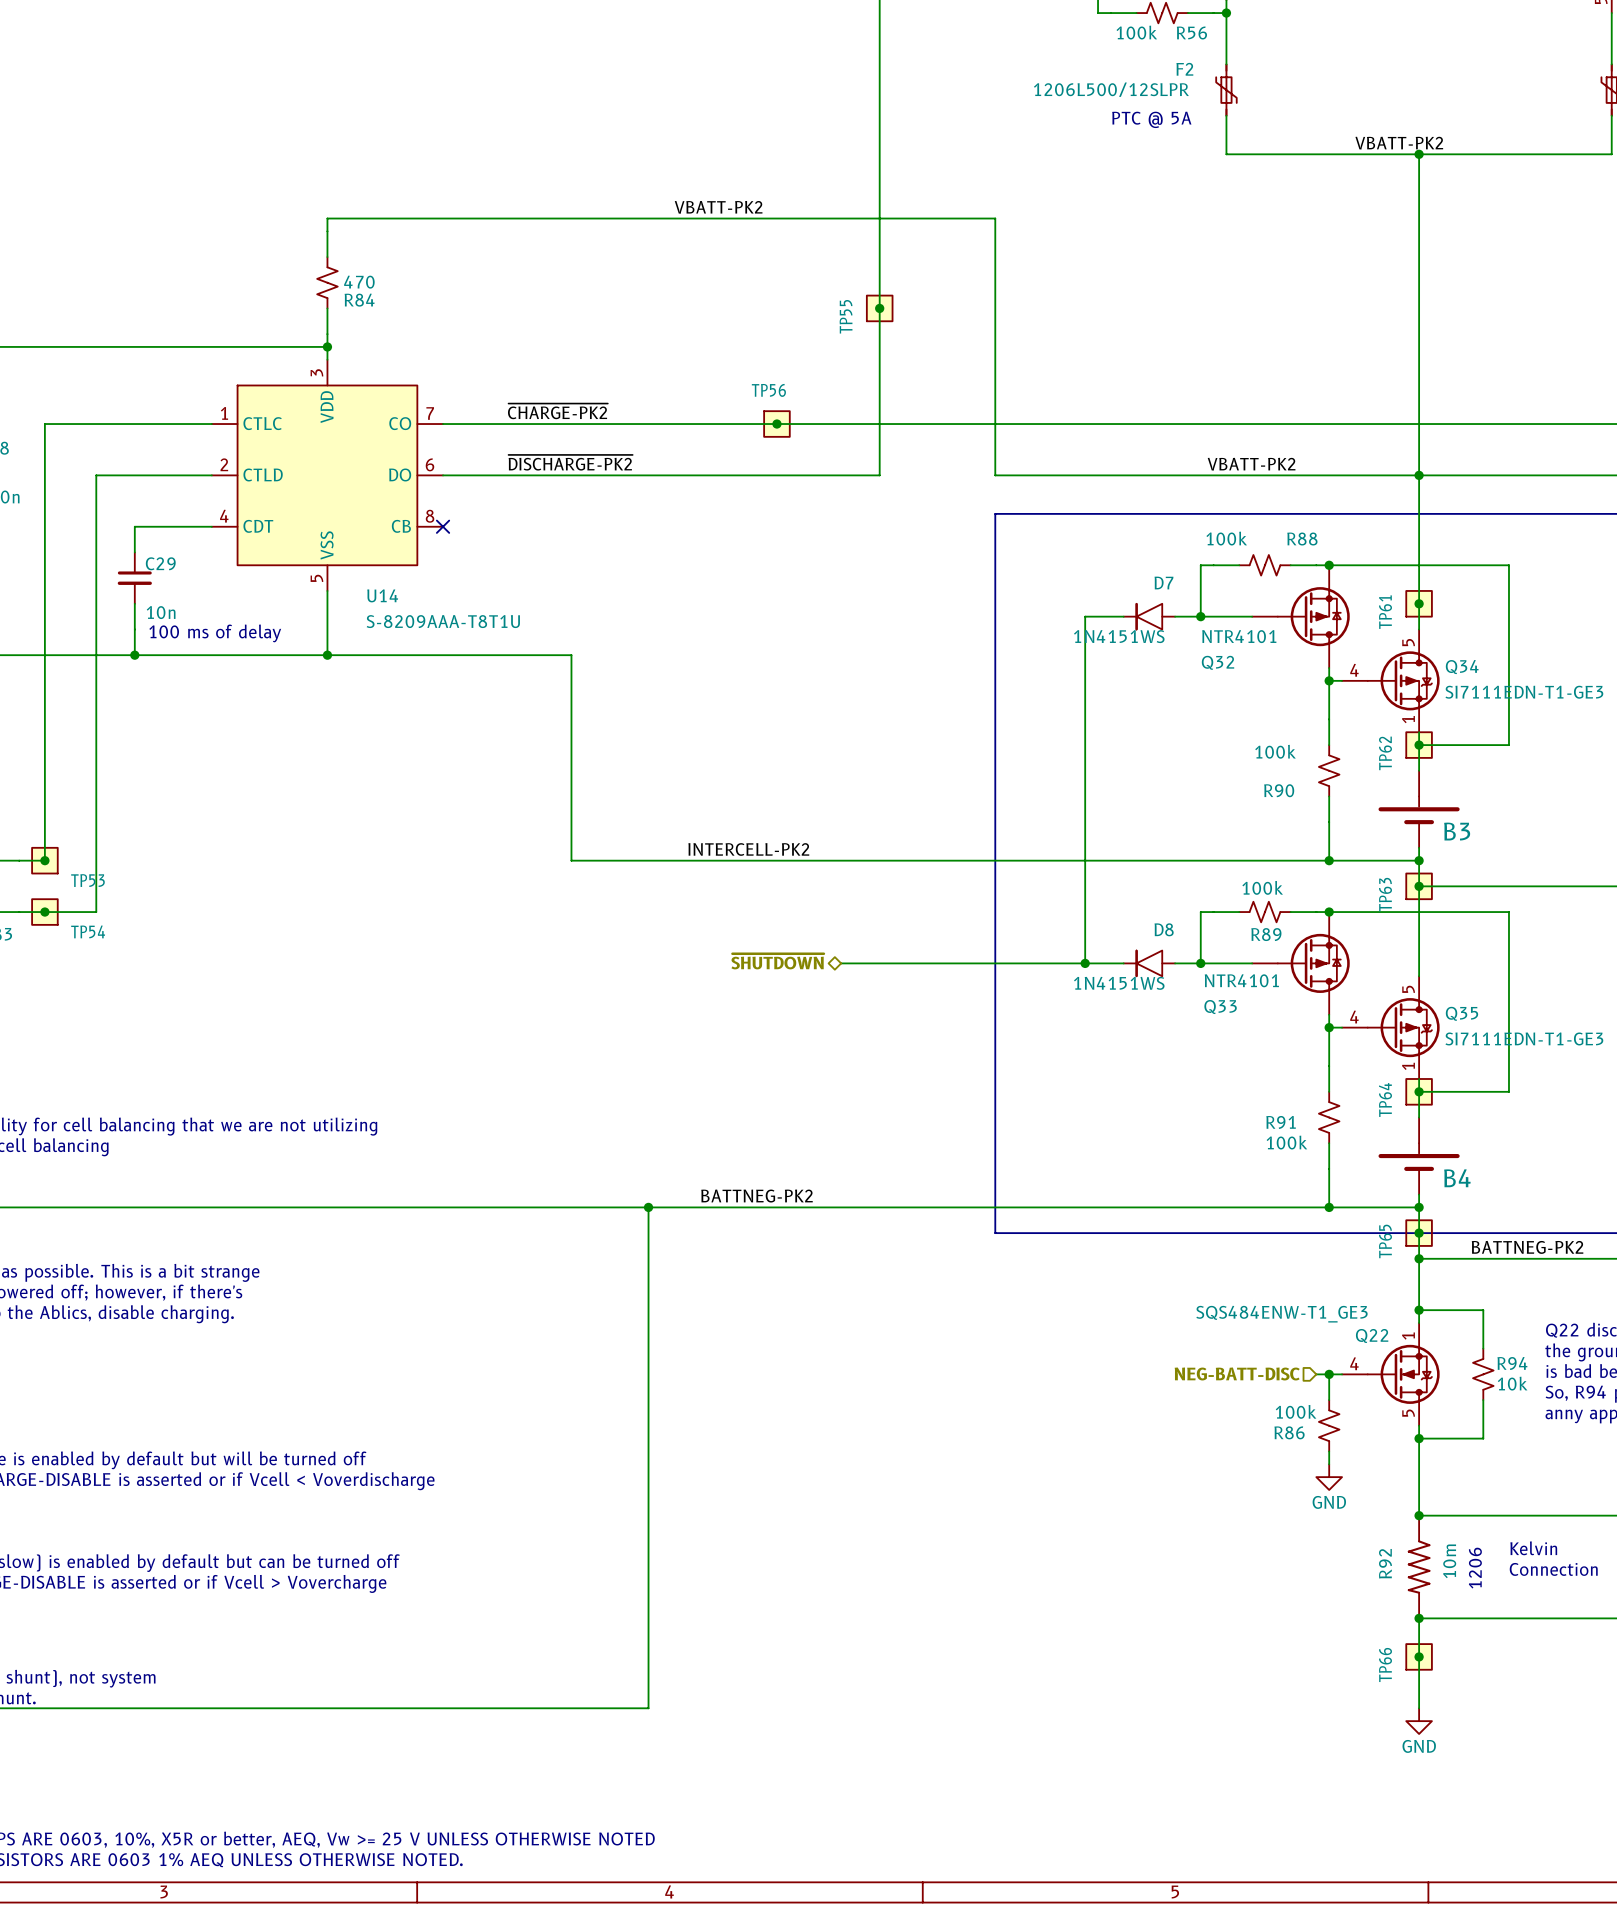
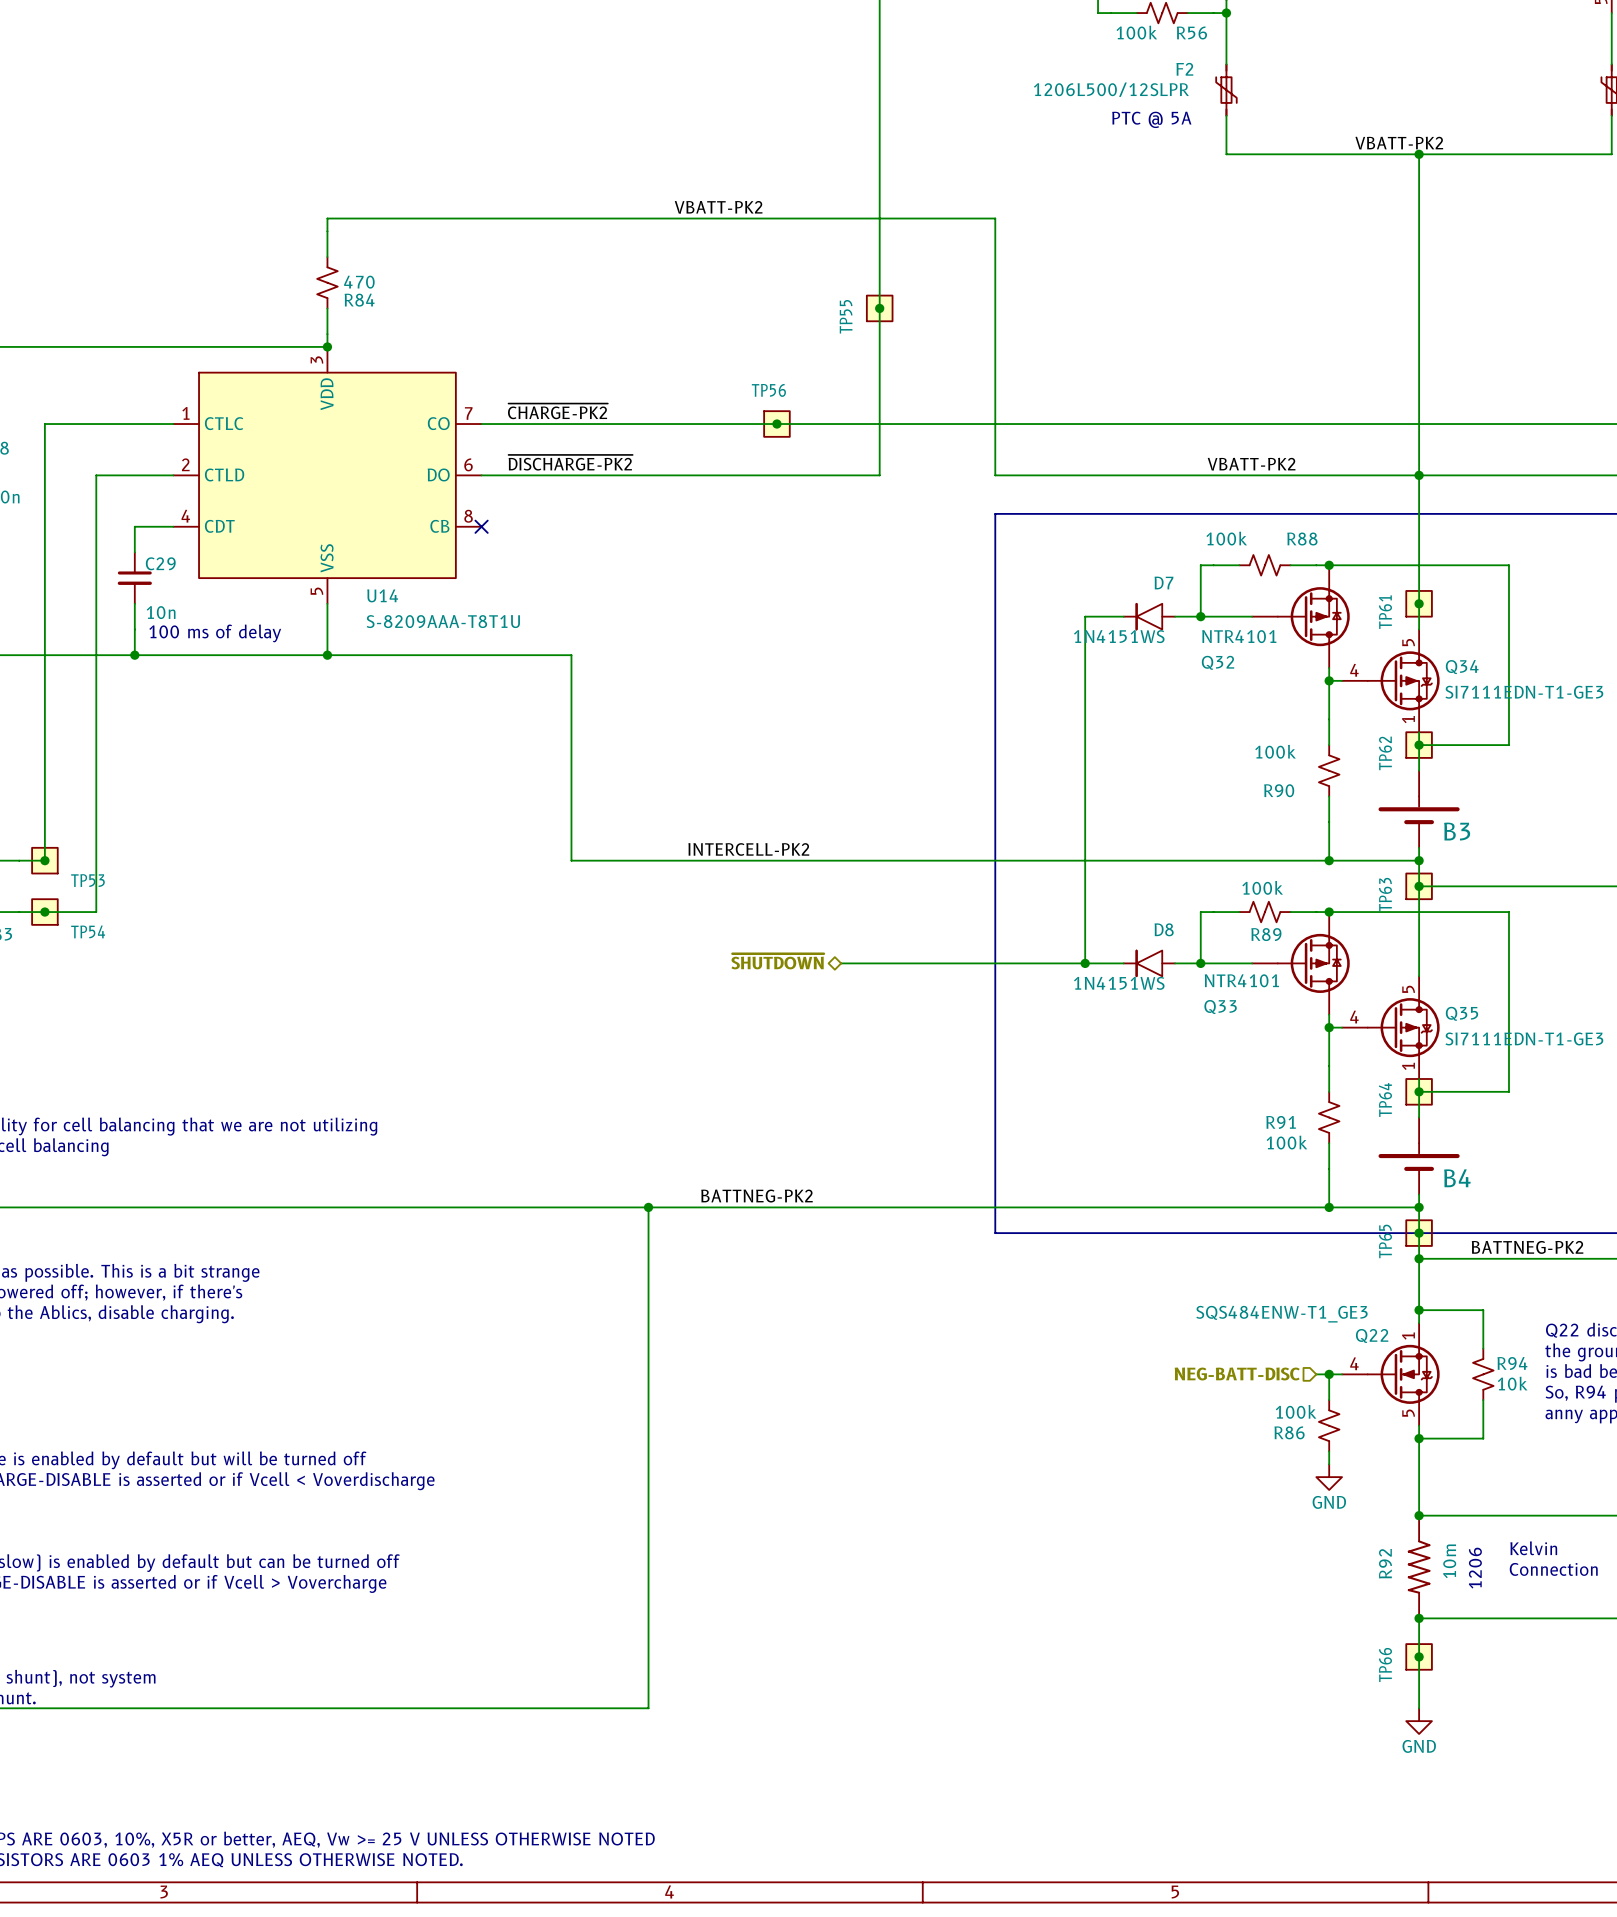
U14 symbol: [211, 359, 444, 591] -> [173, 346, 482, 604]
no-connect mark position: (443, 526) -> (481, 526)

